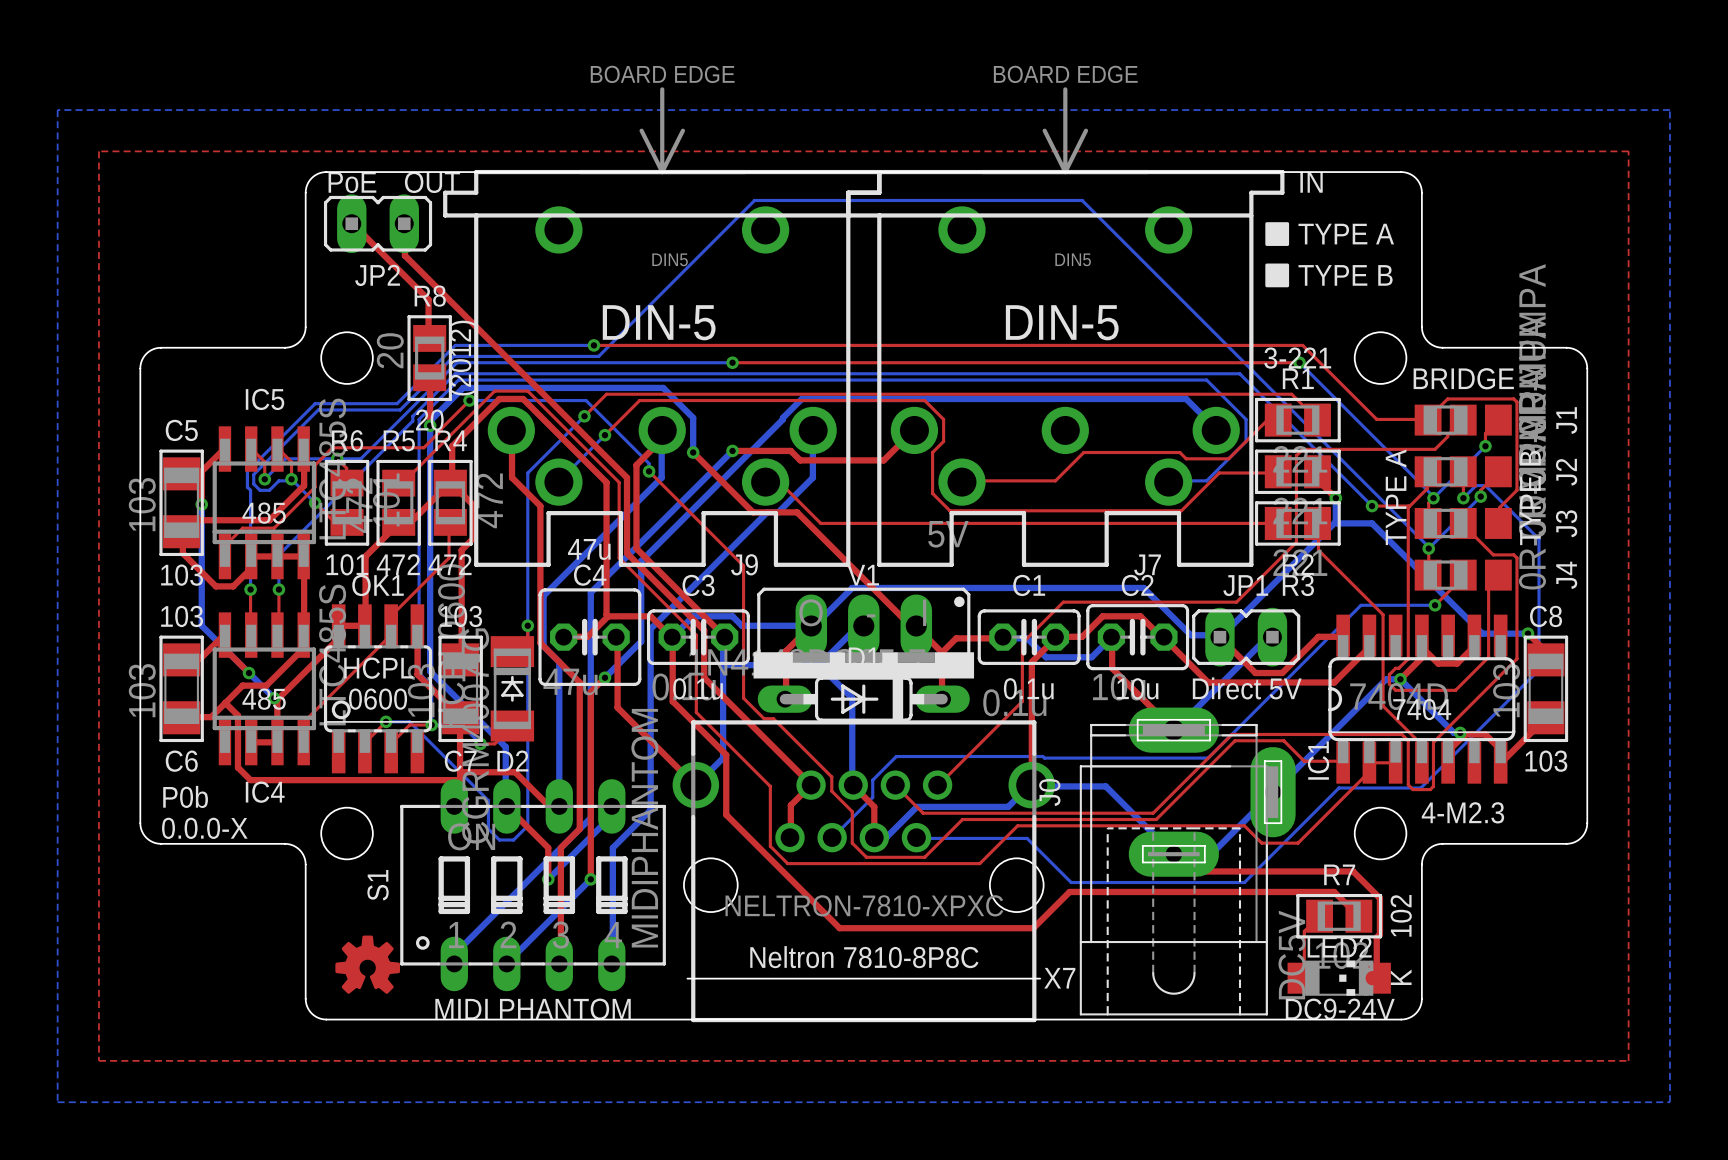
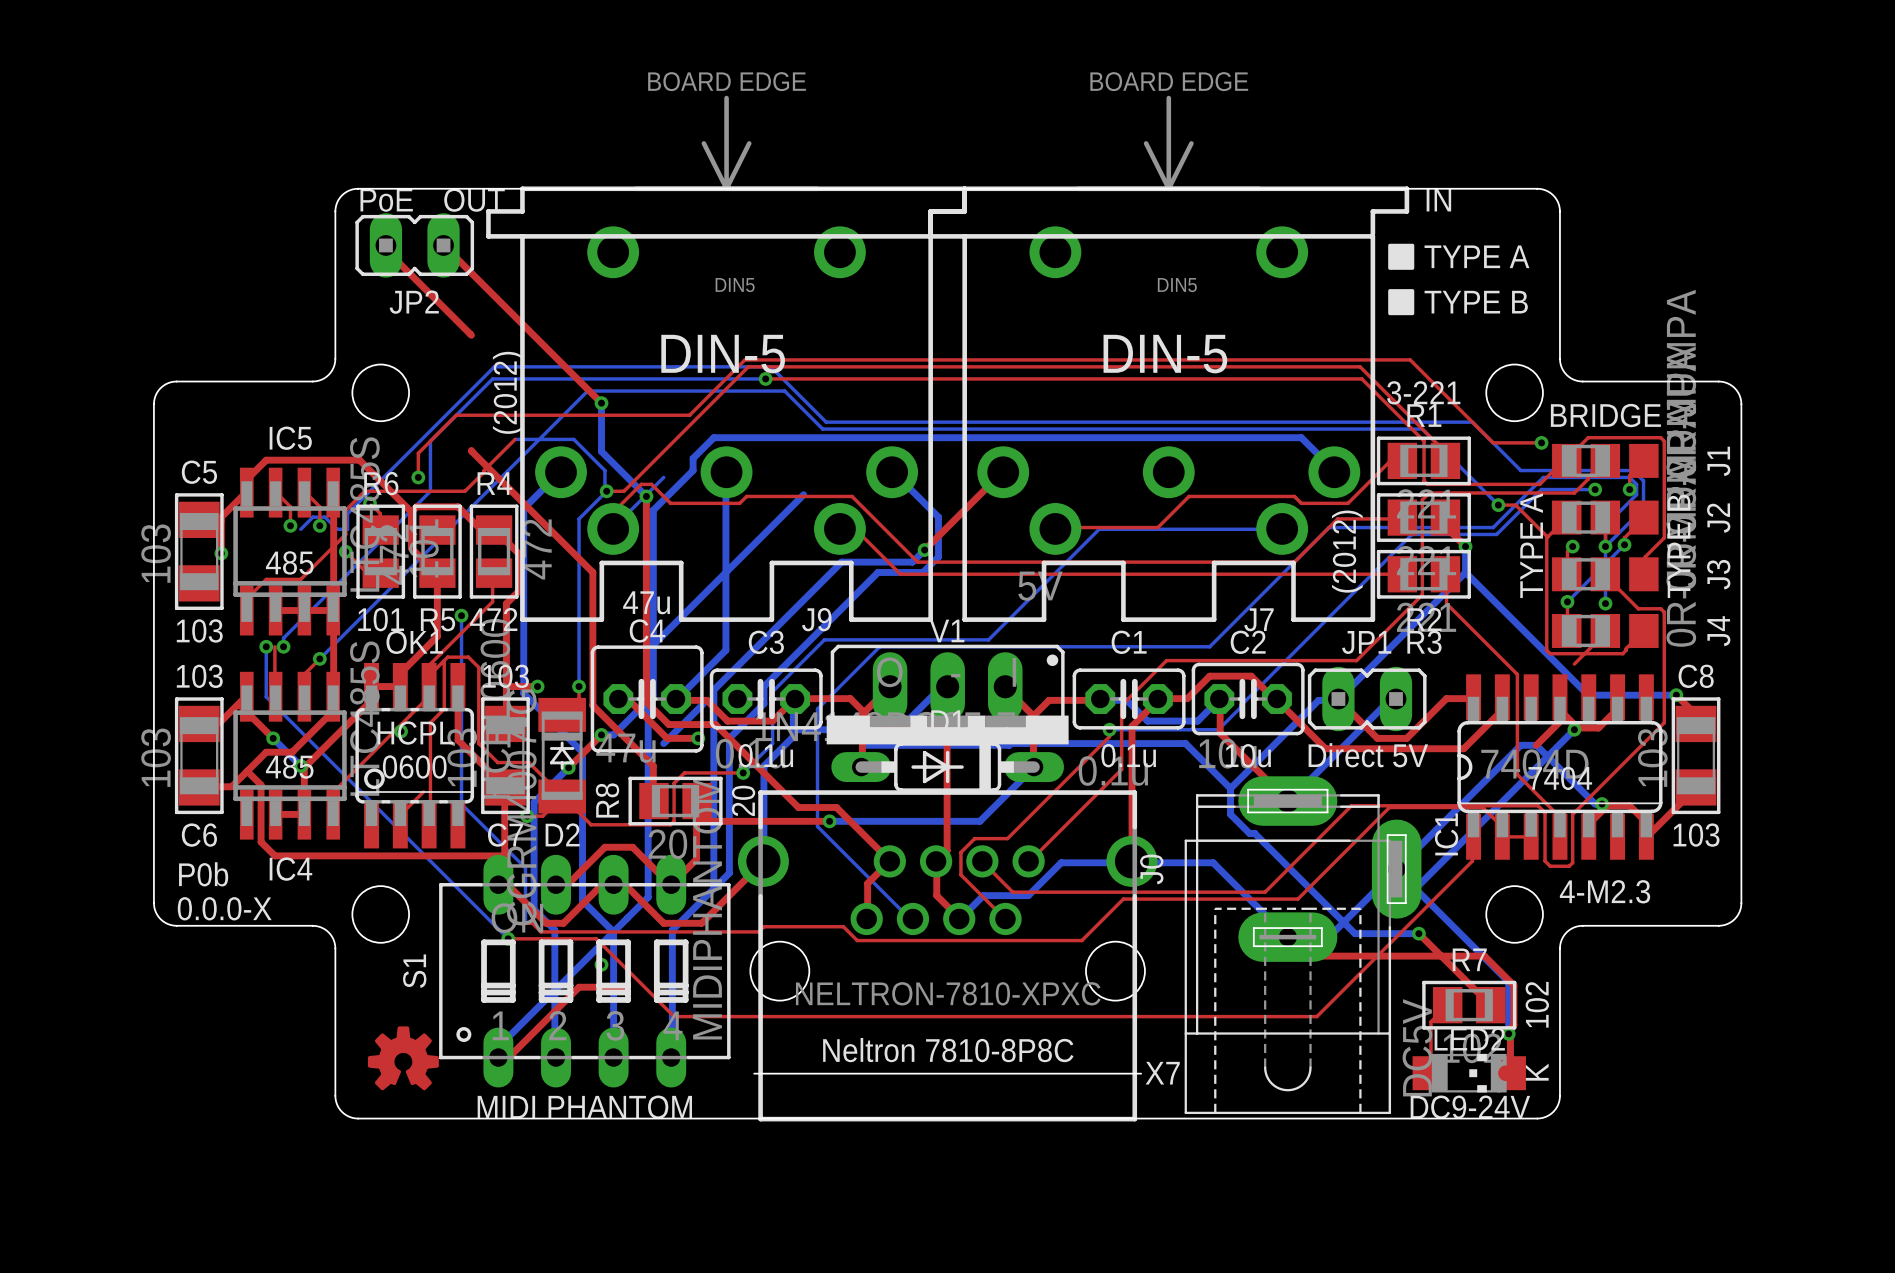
bottom zone outline: (57, 110) (1669, 110) (1669, 1102) (57, 1102) (57, 110) -> none
top zone outline: (98, 151) (1628, 151) (1628, 1060) (98, 1060) (98, 151) -> none
top track: (352, 224) (428, 299) (429, 338) -> (387, 245) (387, 251) (471, 335)
top track: (404, 224) (404, 255) (627, 477) (627, 553) (704, 630) (704, 677) (762, 736) -> (646, 496) (646, 702) (668, 724) (715, 724) (798, 807) (836, 807)
top track: none -> (444, 245) (601, 403)
R8 name position: R8 (430, 296) -> R8 (607, 800)
line: (409, 316) (409, 399) (450, 399) (450, 316) (409, 316) -> none
bottom track: (455, 345) (397, 403) (315, 403) (247, 471) (247, 487) (250, 490) (250, 589) -> (499, 378) (492, 378) (430, 441) (430, 491) (283, 638) (283, 646)
top track: (593, 345) (697, 345) -> none
bottom track: none -> (651, 378) (765, 378)
via: (593, 345) -> none
top track: (1241, 345) (1302, 345) -> (1361, 378) (1424, 441) (1424, 480) (1427, 484) (1539, 484) (1564, 460)
top track: none -> (1429, 378) (1410, 359) (744, 359) (689, 415) (456, 415) (418, 453) (418, 477)
R8 value position: 20 (390, 350) -> 20 (667, 844)
bottom track: (535, 356) (453, 356) (400, 409) (318, 409) (253, 474) (253, 484) (260, 490) (269, 490) (278, 480) (291, 480) (291, 479) (315, 502) -> (587, 391) (319, 658)
bottom track: (598, 356) (754, 200) (1082, 200) (1428, 547) -> (656, 391) (784, 391) (822, 429) (1422, 429) (1498, 505)
R8 rotation: 0° (429, 358) -> 90° clockwise (675, 801)
R8 position: (429, 358) -> (675, 801)
top track: (732, 362) (1299, 362) -> none
bottom track: (732, 362) (456, 362) (360, 458) (285, 458) (264, 479) -> none
via position: (732, 362) -> (765, 378)
bottom track: (1299, 362) (1433, 498) (1485, 446) -> none
via: (1299, 362) -> none
bottom track: none -> (601, 403) (601, 451) (646, 496)
via: none -> (601, 403)
top track: (429, 377) (430, 425) -> none
bottom track: (801, 398) (641, 561) (641, 641) -> (879, 437) (713, 437) (693, 458) (693, 470) (653, 510) (653, 695) (613, 734) (601, 734)
via: (469, 400) -> none
bottom track: (523, 400) (586, 400) (649, 463) (649, 471) -> none
top track: (1361, 403) (1376, 419) (1425, 419) -> (1493, 442) (1541, 442)
via: none -> (1541, 442)
top track: (584, 416) (606, 394) (1291, 394) (1316, 419) -> (606, 491) (623, 491) (748, 366) (1360, 366) (1444, 451) (1444, 460)
bottom track: (584, 416) (552, 447) -> (573, 439) (604, 470) (604, 491) (606, 491)
via: (584, 416) -> none
text rotation: 0° (429, 420) -> 90° counterclockwise (743, 800)
text position: 20 (429, 420) -> 20 (743, 800)
via: (430, 425) -> none
top track: (511, 430) (512, 477) (540, 506) (540, 521) -> (471, 450) (592, 572)
bottom track: none -> (561, 472) (523, 508) (523, 693) (582, 752) (582, 900) (613, 931) (613, 1057)
top track: (662, 430) (661, 439) (636, 465) (636, 548) (724, 636) -> none
bottom track: (812, 430) (812, 477) (778, 512) -> (924, 550) (912, 562) (853, 562)
bottom track: none -> (892, 472) (938, 517) (938, 556) (922, 572) (878, 572) (763, 686) (763, 703) (729, 738) (729, 873) (713, 888)
via: none -> (418, 477)
top track: (604, 435) (639, 400) (924, 400) (943, 419) (943, 441) (932, 452) (932, 493) (949, 510) (1181, 510) -> (613, 528) (613, 512) (641, 484) (651, 484) (670, 503) (739, 503) (746, 496) (852, 496) (917, 562) (1294, 562) (1296, 560)
via: (604, 435) -> none
R5 name position: R5 (399, 440) -> R5 (438, 619)
bottom track: none -> (1595, 489) (1541, 489) (1496, 534) (1411, 534) (1218, 729) (1109, 729)
via: none -> (1595, 489)
via: none -> (606, 491)
top track: none -> (246, 492) (247, 479) (266, 460) (359, 460) (411, 512)
top track: (732, 450) (790, 450) (800, 460) (883, 460) -> (924, 550) (969, 505)
via: (732, 450) -> none
via: none -> (646, 496)
top track: (693, 452) (753, 512) (797, 512) (908, 624) (916, 625) -> none
bottom track: (693, 452) (693, 417) (663, 387) (463, 387) (431, 419) (430, 425) (430, 671) (505, 747) (506, 806) -> none
via: (693, 452) -> none
top track: none -> (1498, 505) (1515, 505) (1547, 537)
top track: none -> (411, 512) (416, 506) (458, 506) (480, 529) (494, 530)
top track: (649, 471) (743, 565) (743, 698) (764, 718) (773, 718) (831, 776) (831, 791) (852, 811) (852, 843) (866, 857) -> none
via: (649, 471) -> none
top track: (1427, 472) (1427, 488) (1408, 507) (1408, 658) (1389, 674) (1389, 684) (1395, 690) (1455, 690) (1488, 657) (1488, 584) -> (1565, 518) (1546, 537) (1546, 650) (1550, 653) (1622, 653) (1633, 641)
bottom track: (661, 477) (543, 595) (543, 646) (559, 662) (559, 806) -> (725, 524) (725, 650) (675, 699)
bottom track: (1168, 482) (1206, 480) (1246, 441) (1246, 419) (1206, 380) (458, 380) (419, 419) (419, 673) (431, 685) (431, 725) (461, 725) (480, 743) -> (1282, 528) (1099, 529) (988, 639) (824, 639) (772, 691) (772, 743) (743, 772)
top track: (398, 483) (403, 482) (494, 391) (527, 391) (619, 482) (619, 558) (696, 635) (696, 712) (770, 786) (770, 846) -> (525, 923) (532, 923) (541, 931) (758, 931) (763, 926) (843, 926) (845, 928)
top track: (304, 485) (269, 520) (198, 520) (185, 532) (181, 531) (182, 553) (215, 586) (233, 586) (250, 569) (251, 556) -> (333, 532) (333, 610)
bottom track: (1476, 485) (1485, 485) (1539, 539) (1539, 669) (1420, 788) (1338, 788) (1244, 882) (1071, 882) (1027, 838) (916, 837) -> (1619, 532) (1643, 508) (1643, 480) (1633, 470) (1520, 470) (1472, 422) (826, 422) (770, 366) (494, 366) (347, 513) (347, 529) (337, 529) (325, 517) (312, 517) (300, 529)
via: none -> (924, 550)
text: none -> (2012) (1347, 551)
bottom track: (201, 504) (201, 625) (249, 673) -> none
top track: (1372, 506) (1409, 506) -> none
bottom track: (1372, 506) (1239, 373) (455, 373) (412, 416) (412, 421) (278, 554) (278, 589) -> none
via position: (1372, 506) -> (1498, 505)
bottom track: (1337, 523) (1372, 523) (1482, 633) -> (1467, 574) (1588, 695) (1626, 695)
top track: (449, 548) (449, 558) (408, 599) -> (492, 601) (430, 664) (430, 674)
via: none -> (1605, 603)
via: none -> (461, 615)
text: 472 (398, 564) -> none
bottom track: none -> (266, 646) (266, 696) (508, 938)
via: none -> (266, 646)
via: (250, 589) -> none
via: none -> (283, 646)
top track: (278, 589) (278, 613) -> (319, 658) (306, 672)
via position: (278, 589) -> (319, 658)
top track: none -> (447, 657) (468, 657) (478, 667) (478, 743) (497, 762) (528, 762) (591, 824) (670, 824) (674, 821) (674, 783) (684, 772) (743, 772)
bottom track: (1435, 605) (1361, 605) (1208, 758) (896, 756) (872, 780) (872, 797) (832, 837) -> (1605, 603) (1605, 525) (1636, 494) (1636, 484) (1629, 477) (1543, 477) (1493, 527) (1329, 527) (1209, 646) (879, 646) (817, 709) (817, 826) (909, 918) (912, 918)
via: (1435, 605) -> none
top track: (365, 613) (365, 556) (398, 522) (411, 521) (450, 483) (452, 480) (452, 446) (499, 398) (523, 398) (606, 482) (606, 614) (608, 616) -> (401, 672) (437, 636) (437, 573) (411, 548) (411, 512)
top track: (608, 616) (587, 636) (563, 637) -> (698, 738) (667, 738) (629, 700) (618, 699)
top track: (608, 616) (650, 616) (672, 637) (672, 701) (726, 754) (726, 814) (839, 928) (1033, 928) (1069, 891) (1334, 891) -> (1418, 933) (1463, 978)
bottom track: (527, 624) (527, 825) (513, 839) (499, 839) (488, 828) (488, 800) (478, 791) -> (525, 923) (525, 867)
top track: none -> (506, 686) (537, 686)
via: none -> (537, 686)
top track: none -> (947, 686) (947, 850) (936, 861)
bottom track: (1222, 635) (1219, 637) (1217, 635) (1190, 635) (1143, 587) (852, 587) (814, 625) (742, 625) (732, 616) (693, 616) (672, 637) -> (1341, 696) (1337, 700) (1318, 700) (1230, 788)
top track: (617, 638) (617, 707) (695, 785) -> (677, 700) (706, 700) (727, 721) (772, 721) (795, 699) (850, 698) (881, 729) (947, 729)
bottom track: (819, 665) (852, 698) (853, 785) -> none
top track: none -> (1109, 729) (1109, 736) (1007, 838) (974, 838) (960, 852) (960, 874) (1005, 918)
via: none -> (1109, 729)
bottom track: none -> (1574, 729) (1417, 886) (1396, 869) (1508, 982) (1508, 1033)
via: none -> (1574, 729)
via: none -> (401, 731)
top track: none -> (601, 734) (568, 767)
via: none -> (601, 734)
bottom track: (723, 671) (723, 758) (696, 784) -> (793, 736) (763, 766) (763, 861)
via: none -> (698, 738)
top track: (604, 677) (590, 691) (590, 879) -> none
via: (604, 677) -> none
bottom track: none -> (862, 745) (1185, 743) (1230, 788)
via: (1400, 679) -> none
top track: (579, 682) (579, 828) (560, 847) (560, 962) (559, 963) -> (636, 748) (653, 766) (653, 801)
via: none -> (568, 767)
bottom track: none -> (1034, 767) (979, 821) (829, 821)
via: none -> (743, 772)
line: none -> (630, 778) (720, 778) (720, 823) (630, 823) (630, 778)
bottom track: none -> (1230, 788) (1230, 814) (1249, 833) (1254, 833) (1354, 933) (1418, 933)
bottom track: (386, 721) (409, 721) (420, 732) -> (461, 615) (461, 804)
via: (386, 721) -> none
top track: (431, 725) (409, 725) (392, 742) -> (444, 660) (444, 709) (430, 722) (430, 814)
via: (431, 725) -> none
top track: none -> (696, 821) (829, 821)
via: none -> (829, 821)
top track: (1343, 762) (1304, 761) (1283, 740) (1235, 740) (1156, 819) -> (1502, 836) (1501, 826) (1482, 807) (1389, 807) (1297, 899) (1268, 899)
top track: none -> (1473, 836) (1472, 861) (1316, 1016) (674, 1016) (596, 938) (508, 938)
top track: (1369, 762) (1368, 772) (1298, 843) (1261, 843) (1244, 825) (1017, 825) -> (1123, 899) (1116, 906)
top track: (460, 772) (515, 772) (548, 805) (559, 806) -> none
top track: none -> (763, 861) (701, 923) (663, 923) (625, 885) (613, 884) (601, 885) (563, 923) (546, 923) (504, 881) (498, 884)
top track: (853, 786) (874, 806) (874, 836) -> (936, 862) (936, 895) (959, 918)
bottom track: (1028, 786) (1008, 806) (916, 806) (886, 836) (875, 836) -> (1128, 862) (1061, 862) (1028, 895) (983, 895) (960, 918)
top track: (506, 806) (548, 847) (548, 879) -> (556, 884) (568, 883) (604, 847) (632, 847) (671, 884) (696, 859) (697, 801)
bottom track: (611, 806) (611, 816) (548, 879) -> none
top track: (1023, 819) (962, 819) (924, 857) -> (1081, 940) (1014, 940)
via: none -> (1418, 933)
via: none -> (508, 938)
top track: (781, 857) (787, 863) (979, 863) (986, 857) -> (857, 940) (950, 940)
bottom track: (590, 879) (506, 963) -> (568, 767) (534, 802) (534, 909) (554, 930) (556, 1057)
via: (590, 879) -> none
top track: none -> (627, 987) (579, 987) (509, 1056) (498, 1057)
via: none -> (1508, 1033)

